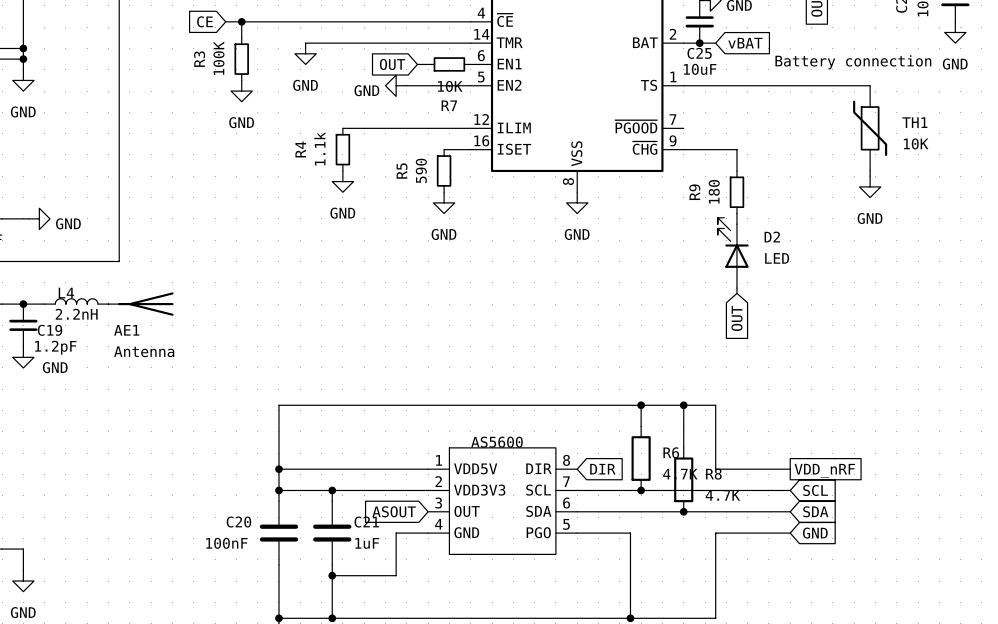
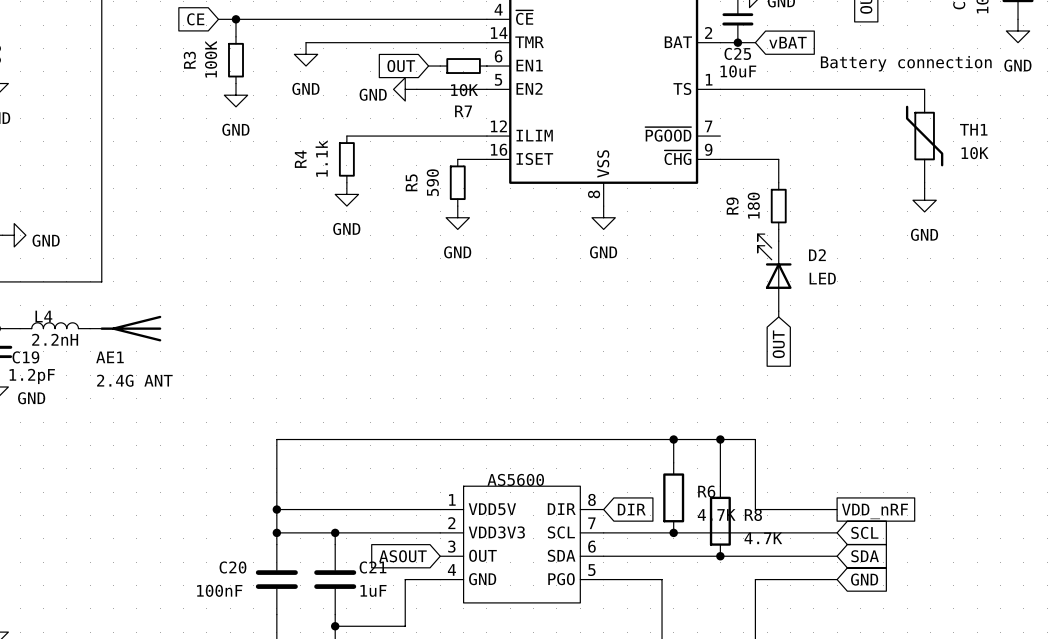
AE1 value: Antenna (144, 351) -> 2.4G ANT (134, 380)

